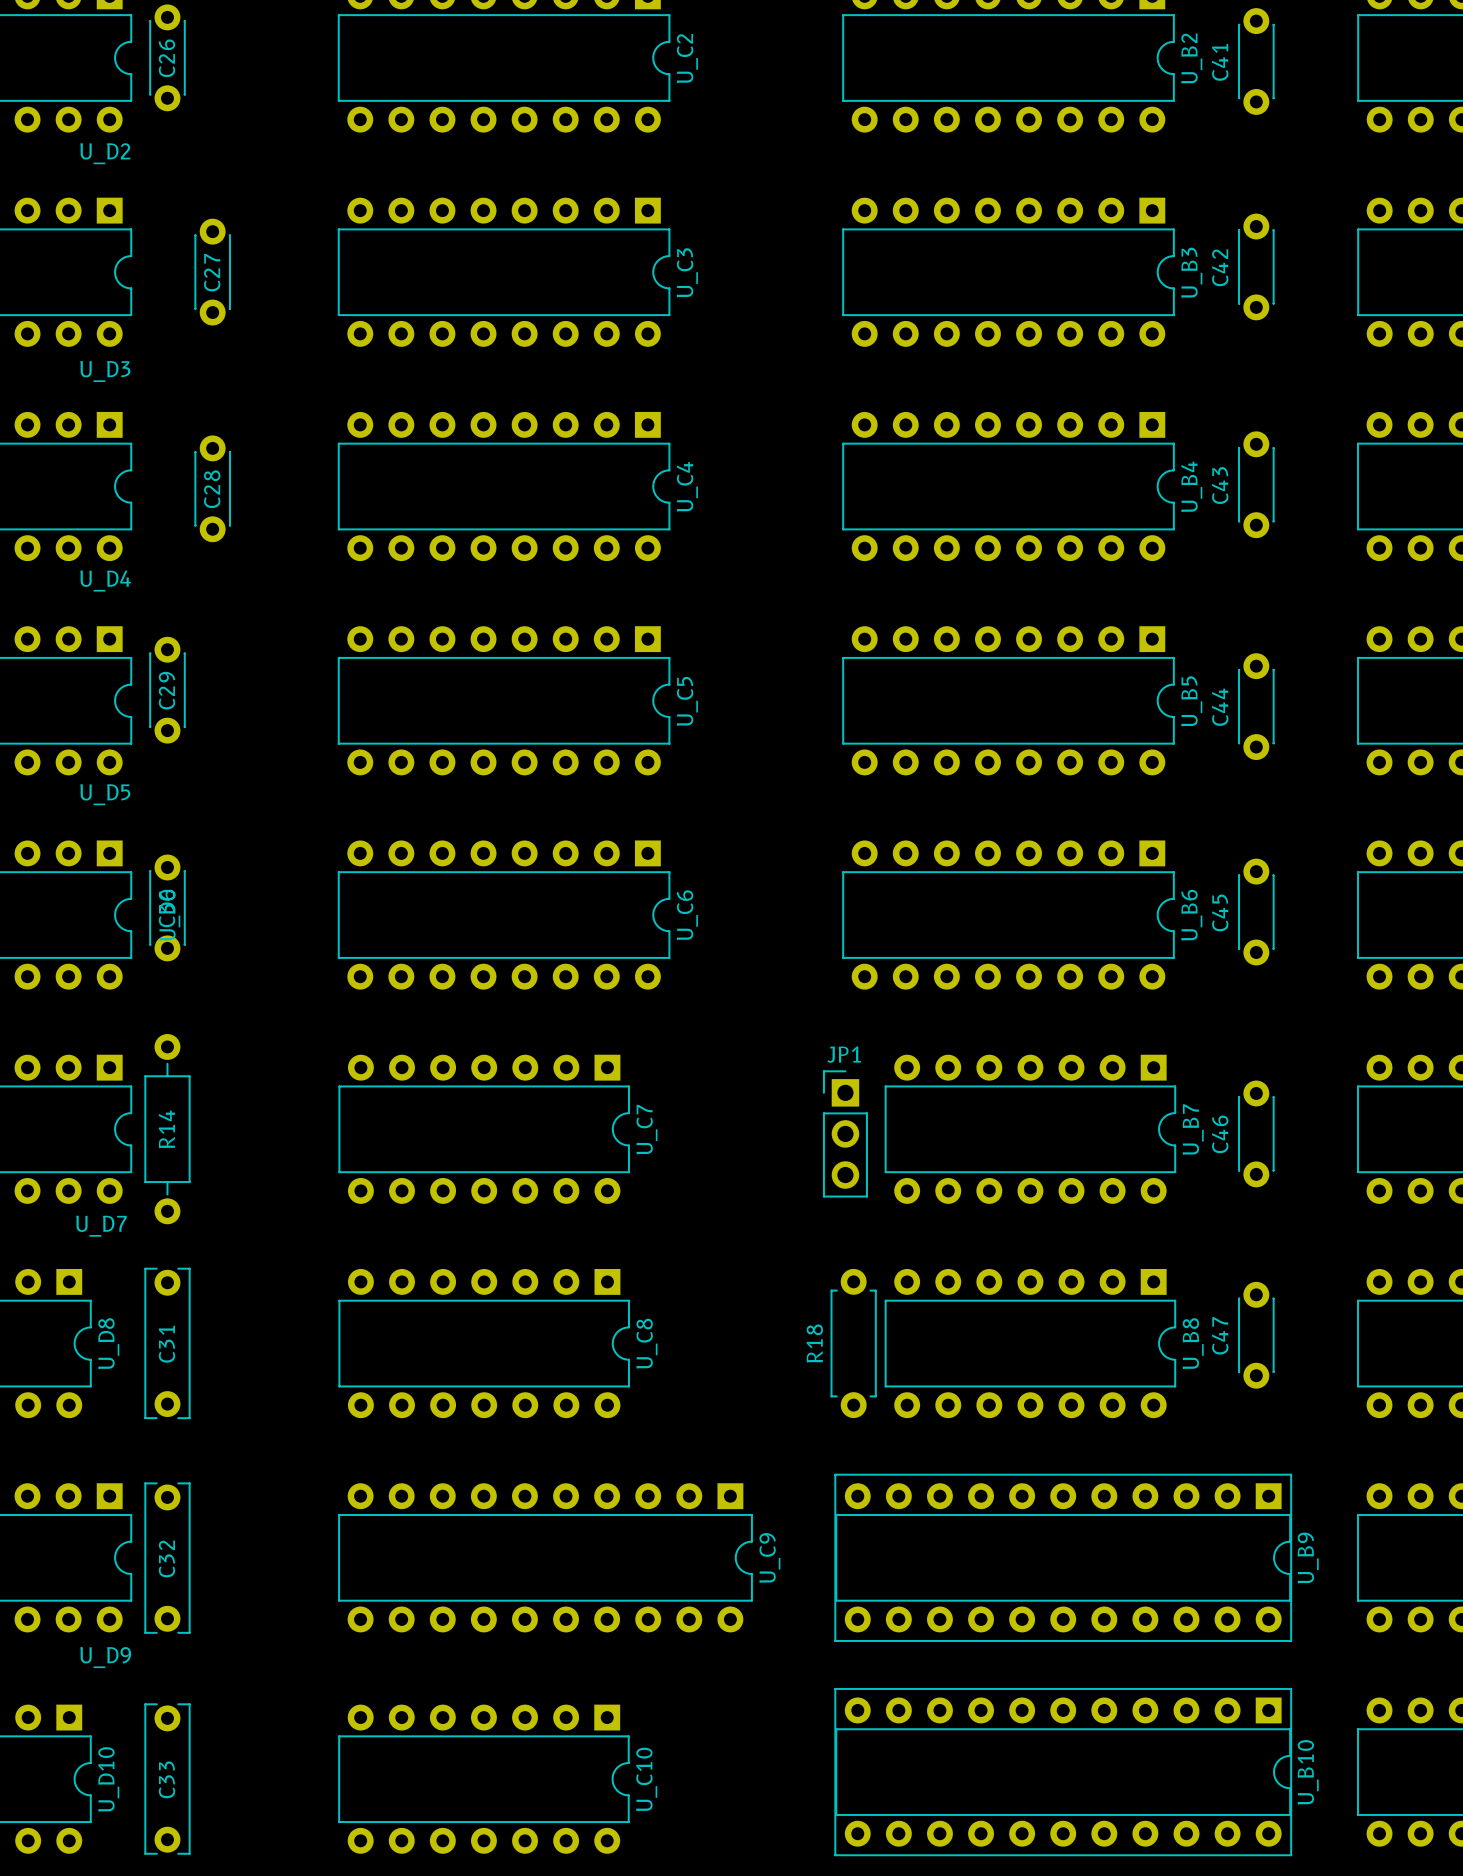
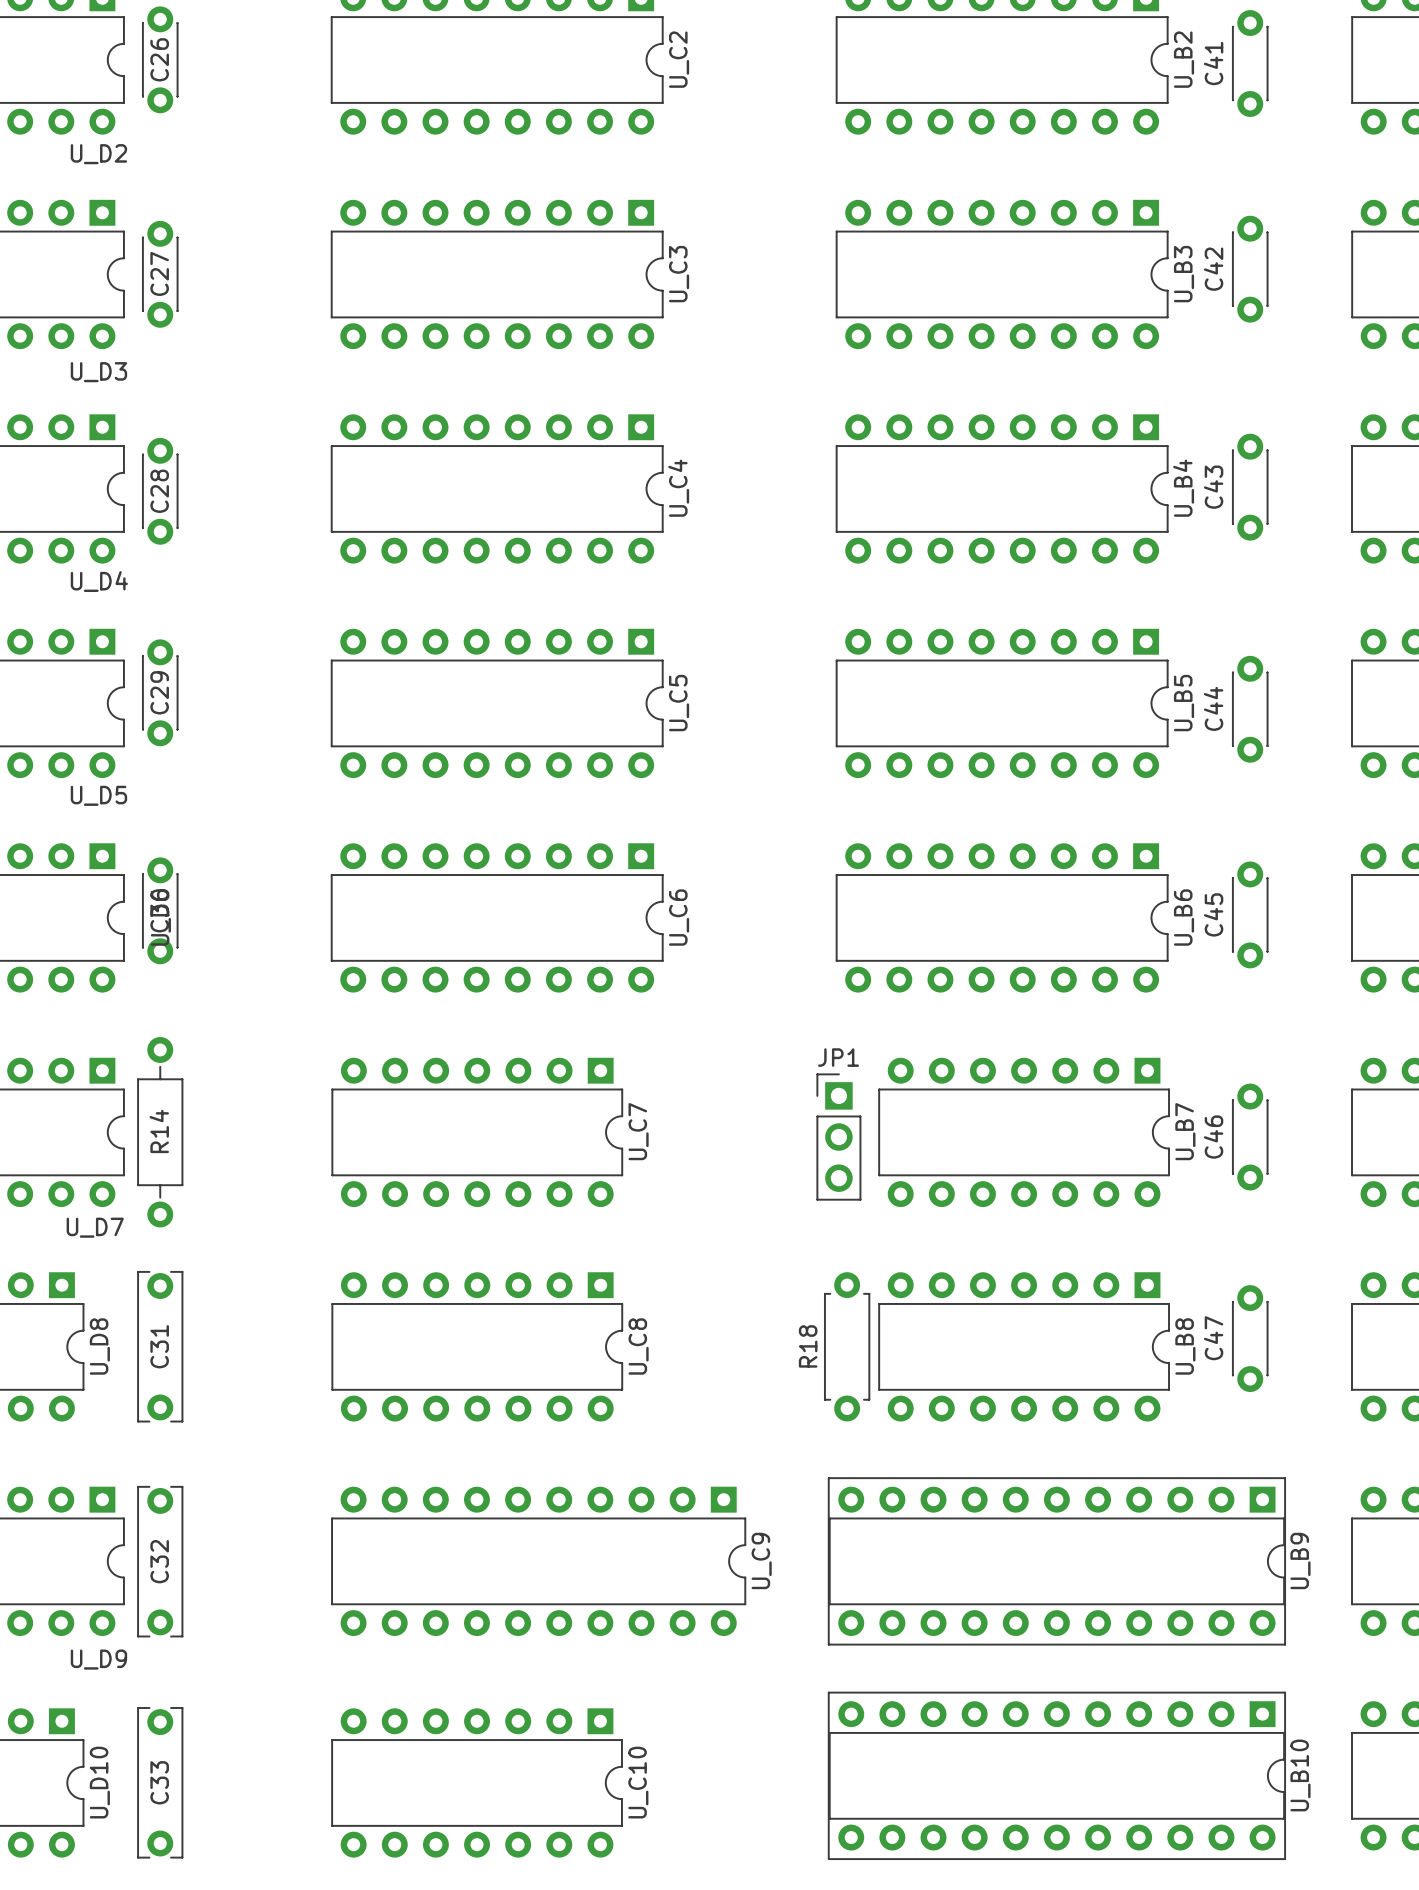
C27 position: (212, 272) -> (160, 274)
C28 position: (212, 488) -> (160, 491)

